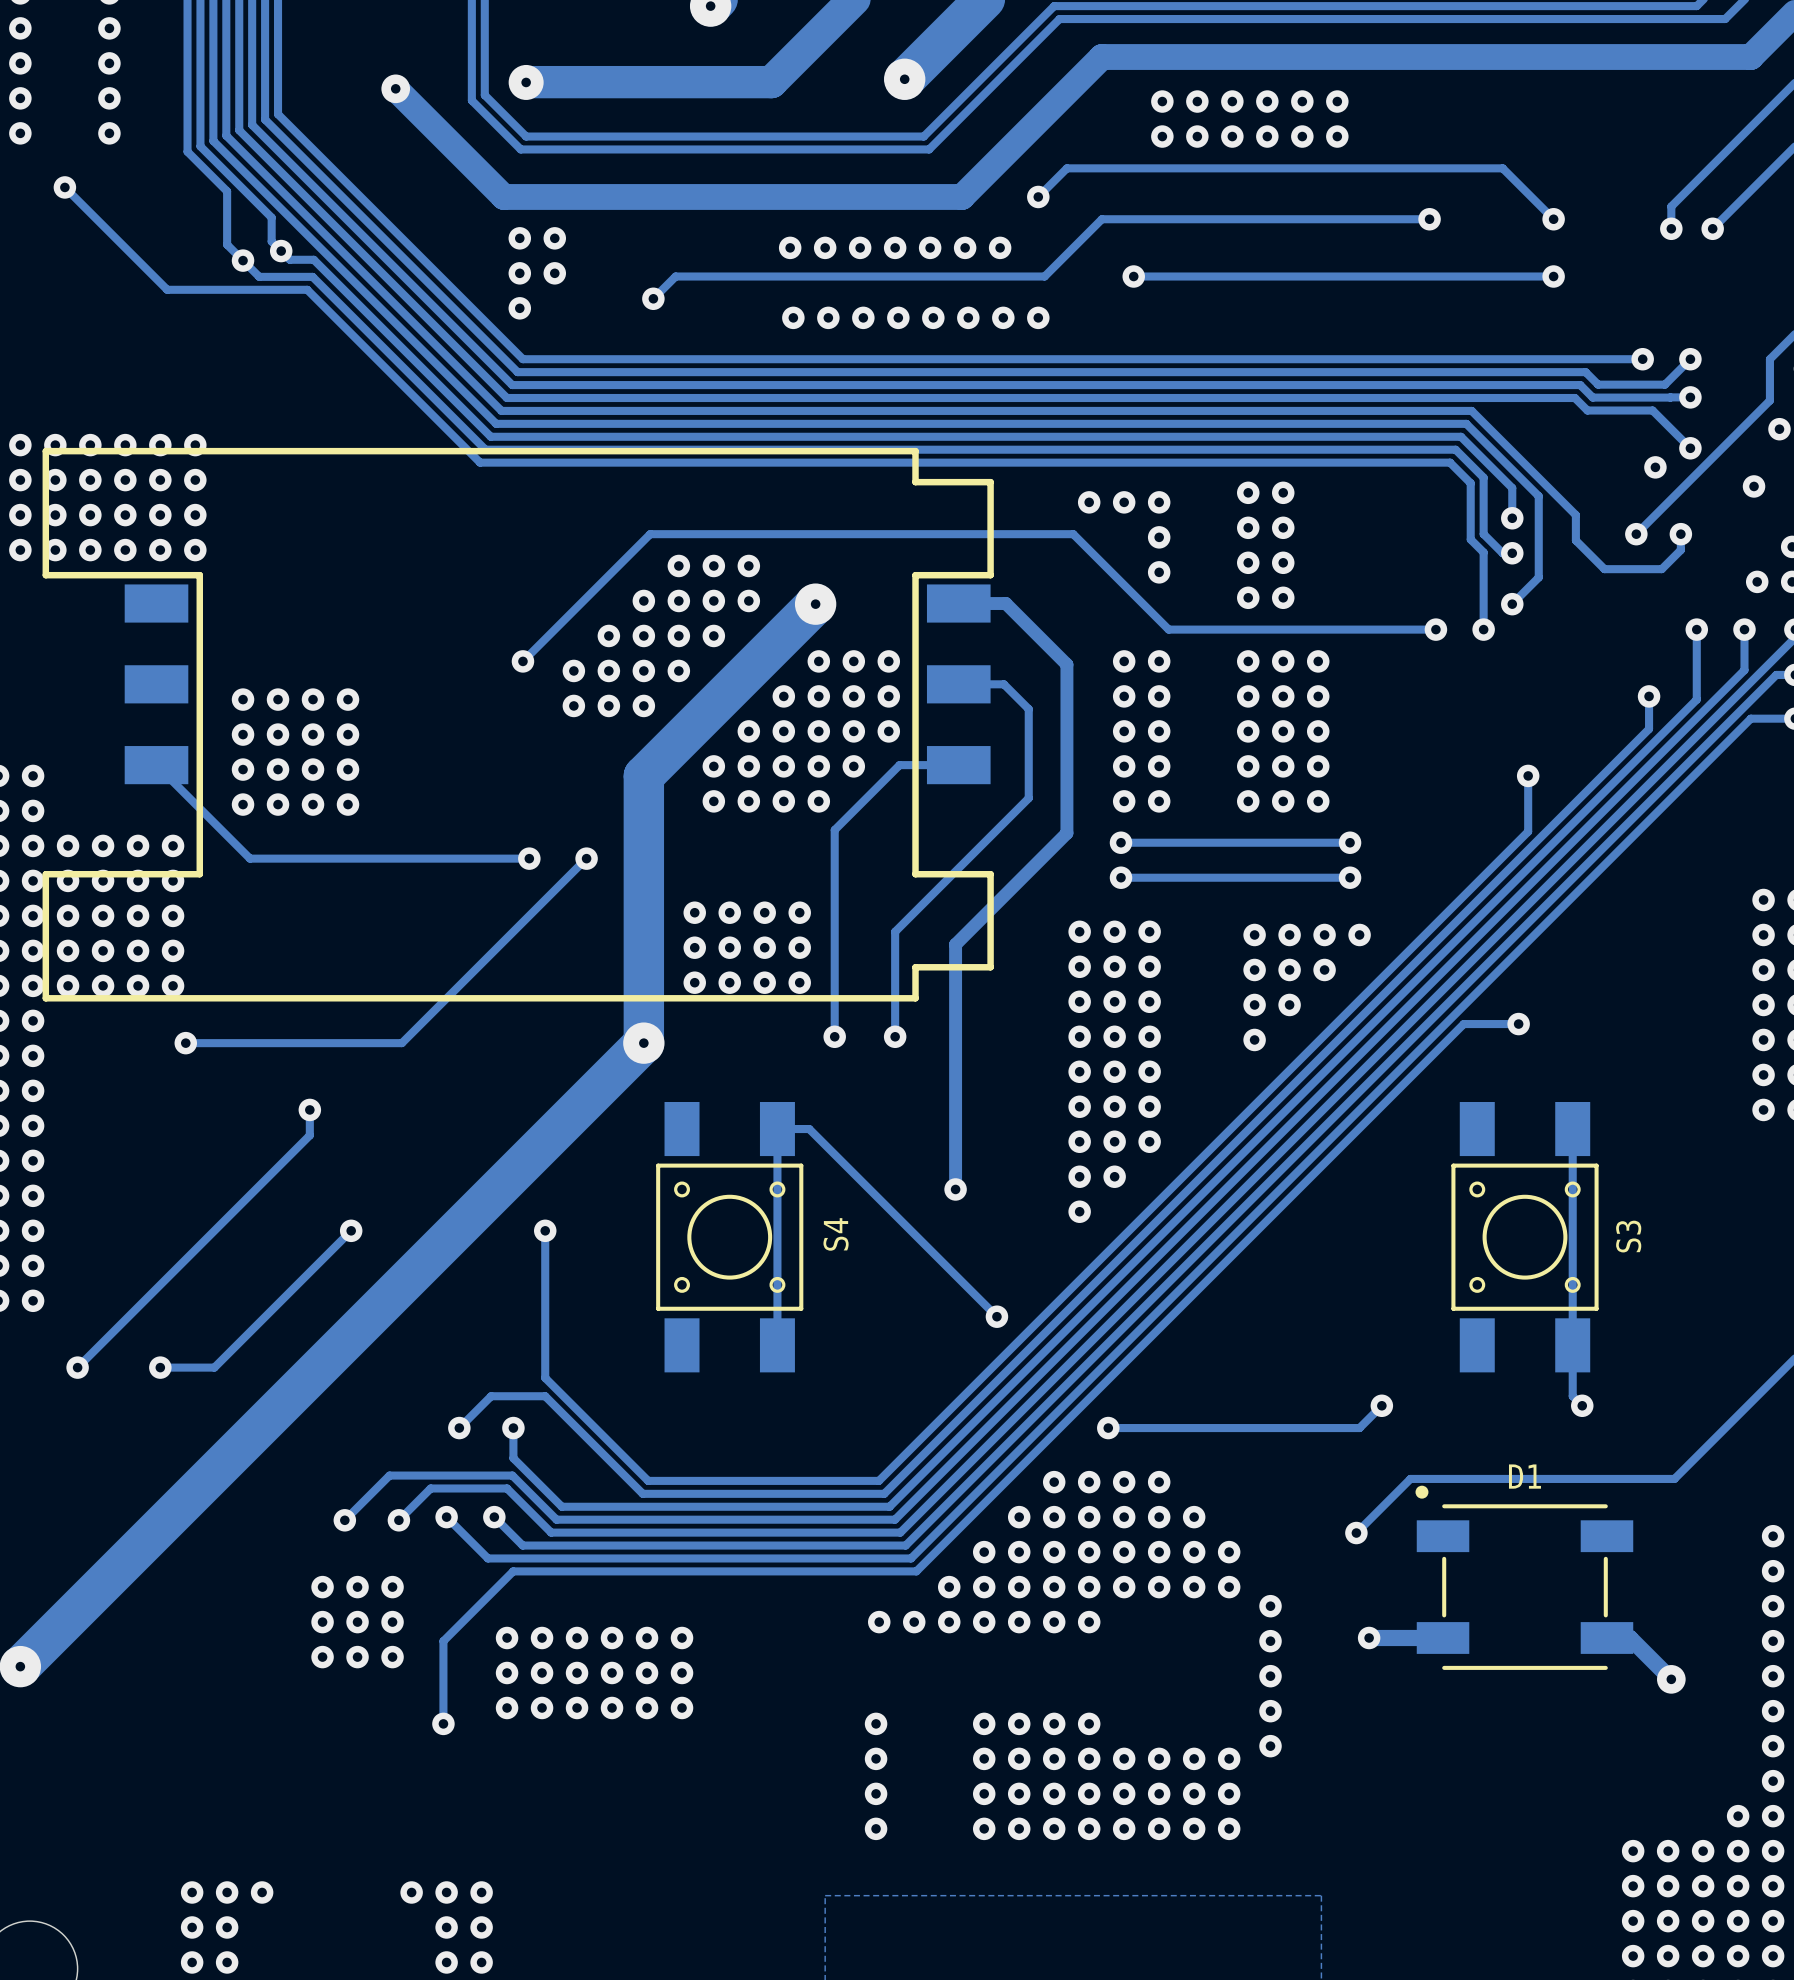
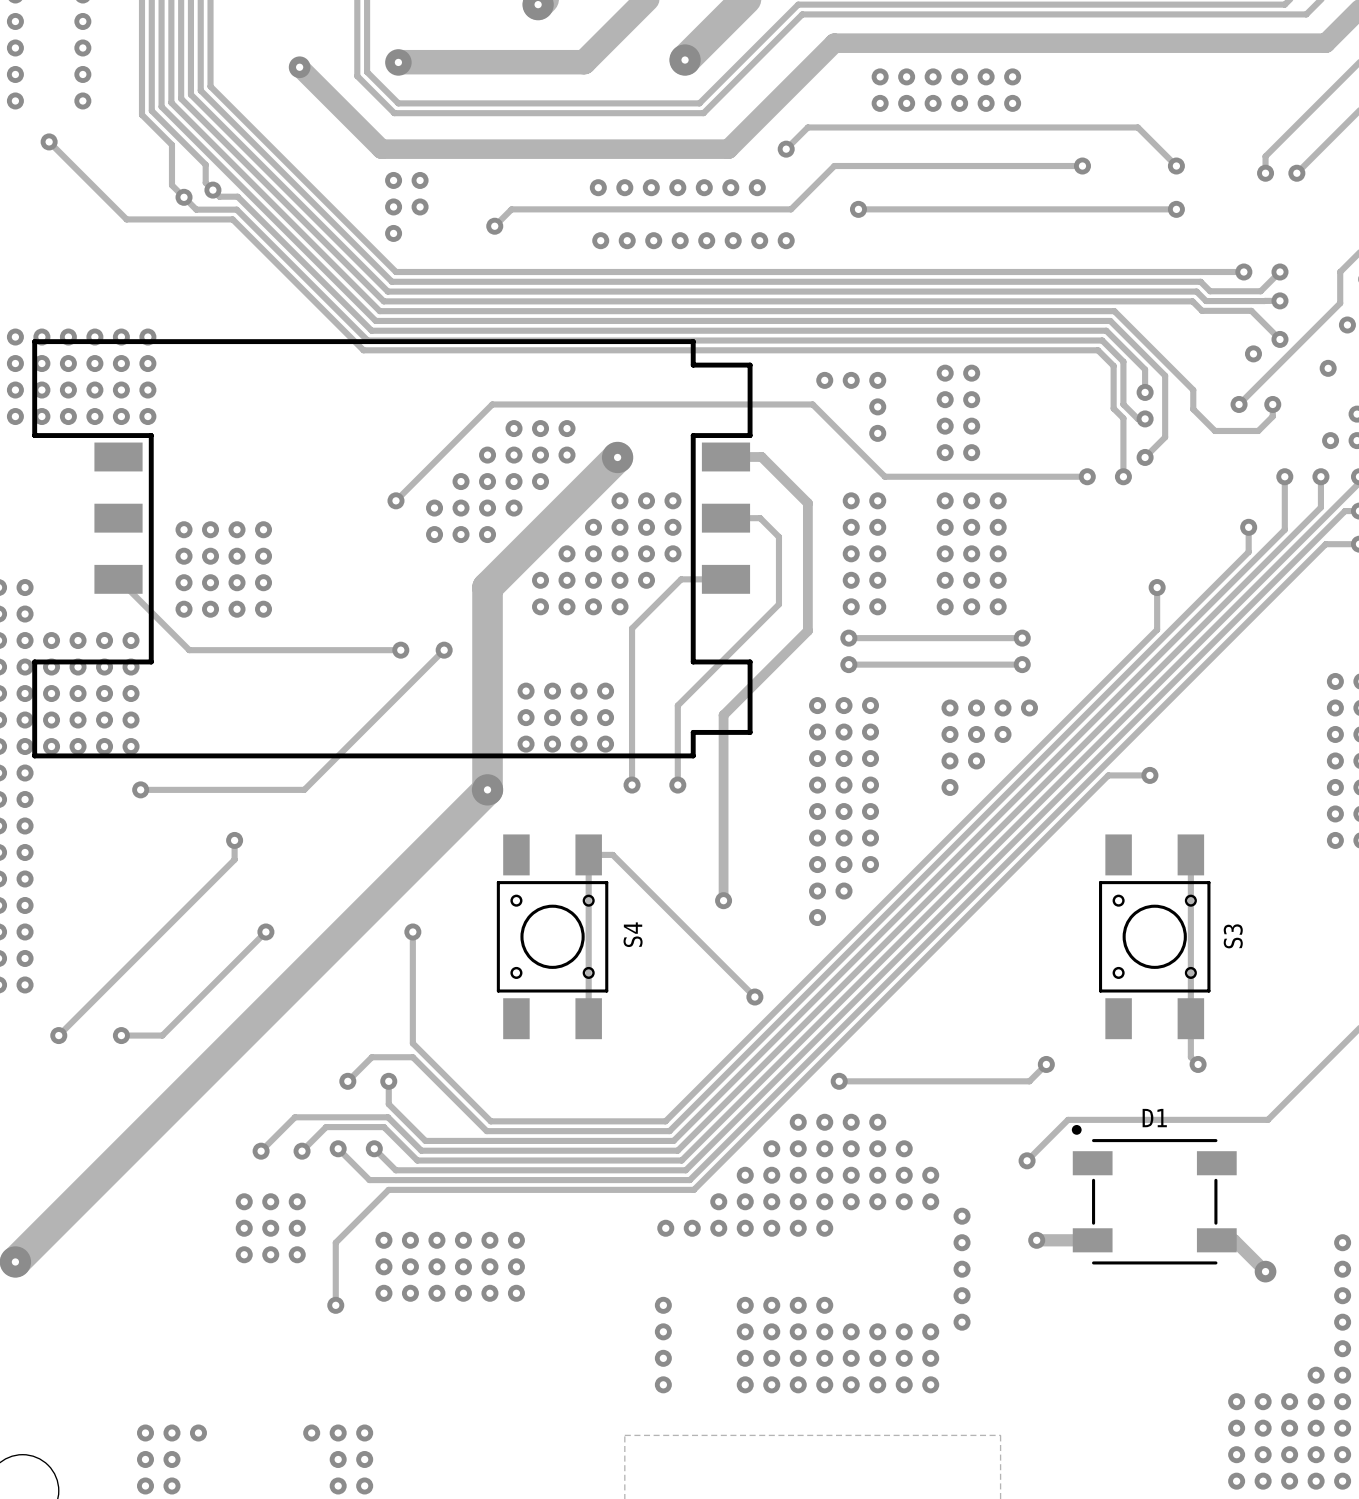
via: (1773, 1536) -> none
via: (1773, 1571) -> none
via: (1773, 1606) -> none

